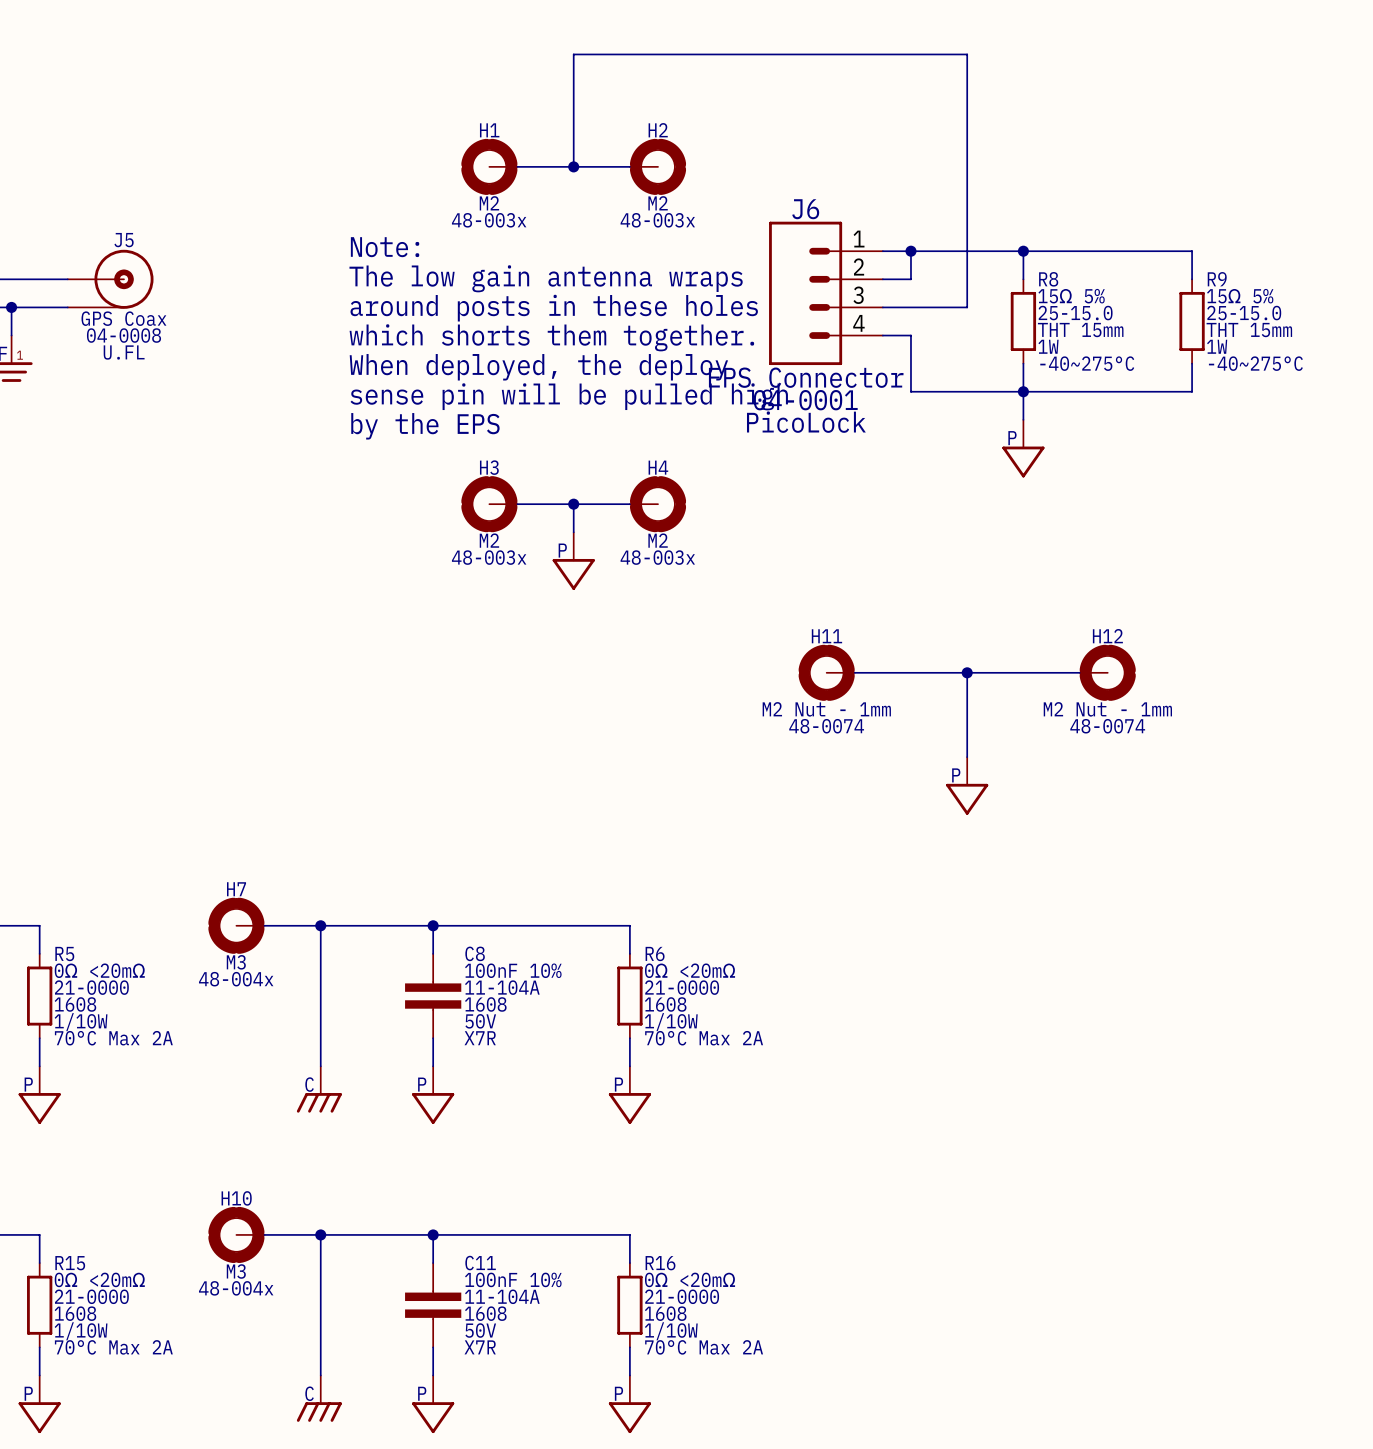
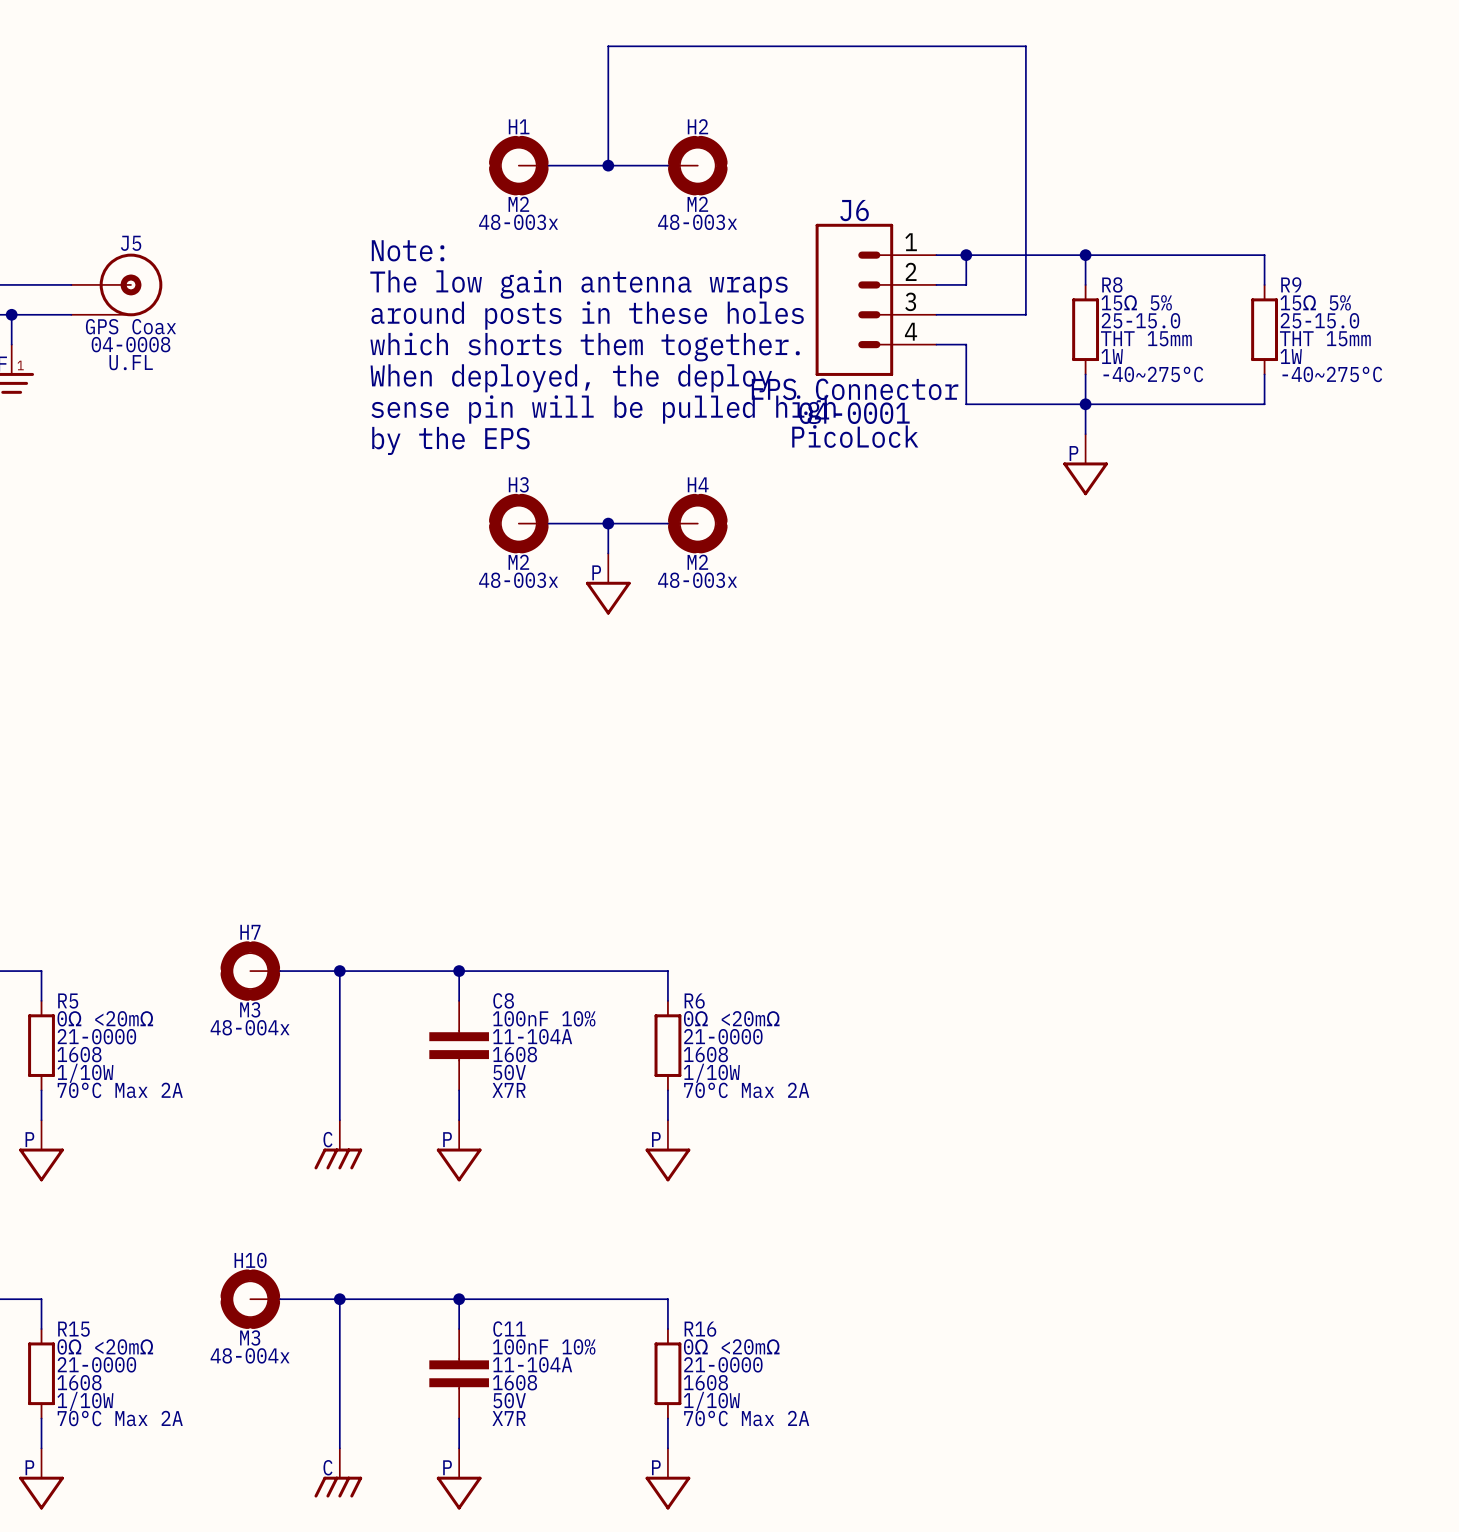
H11: M2 Nut - 1mm (826, 672) -> none
wire: (854, 672) (1079, 672) -> none
wire: (967, 672) (967, 757) -> none
junction: (967, 672) -> none
H12: M2 Nut - 1mm (1107, 672) -> none
power symbol: (967, 785) -> none

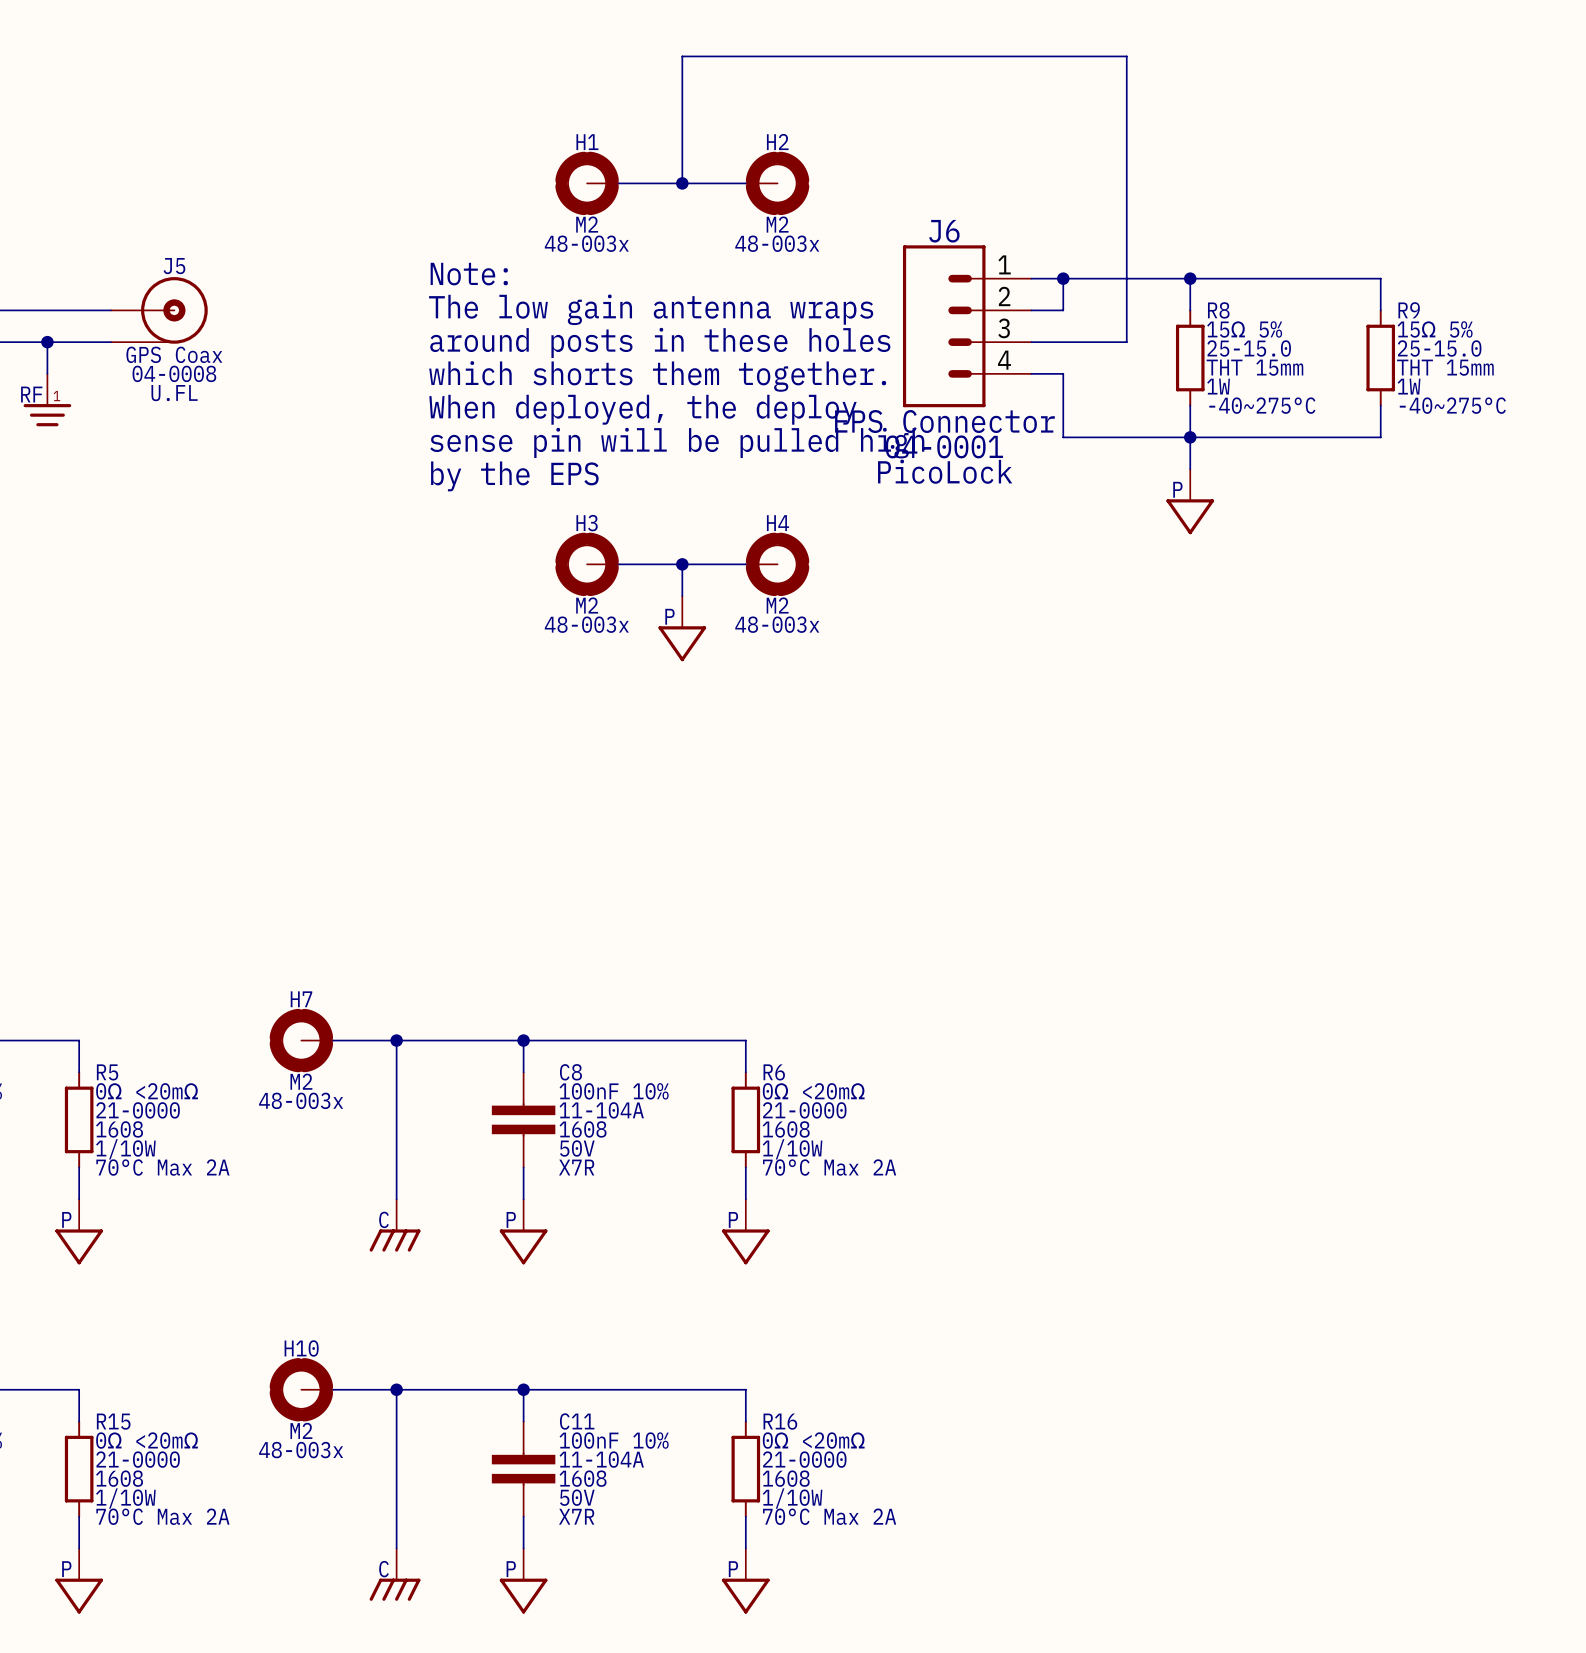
H7 value: M3 (250, 1009) -> M2 (301, 1081)
H7 text: 48-004x (250, 1027) -> 48-003x (301, 1100)
H10 value: M3 (250, 1337) -> M2 (301, 1430)
H10 text: 48-004x (250, 1355) -> 48-003x (301, 1450)

